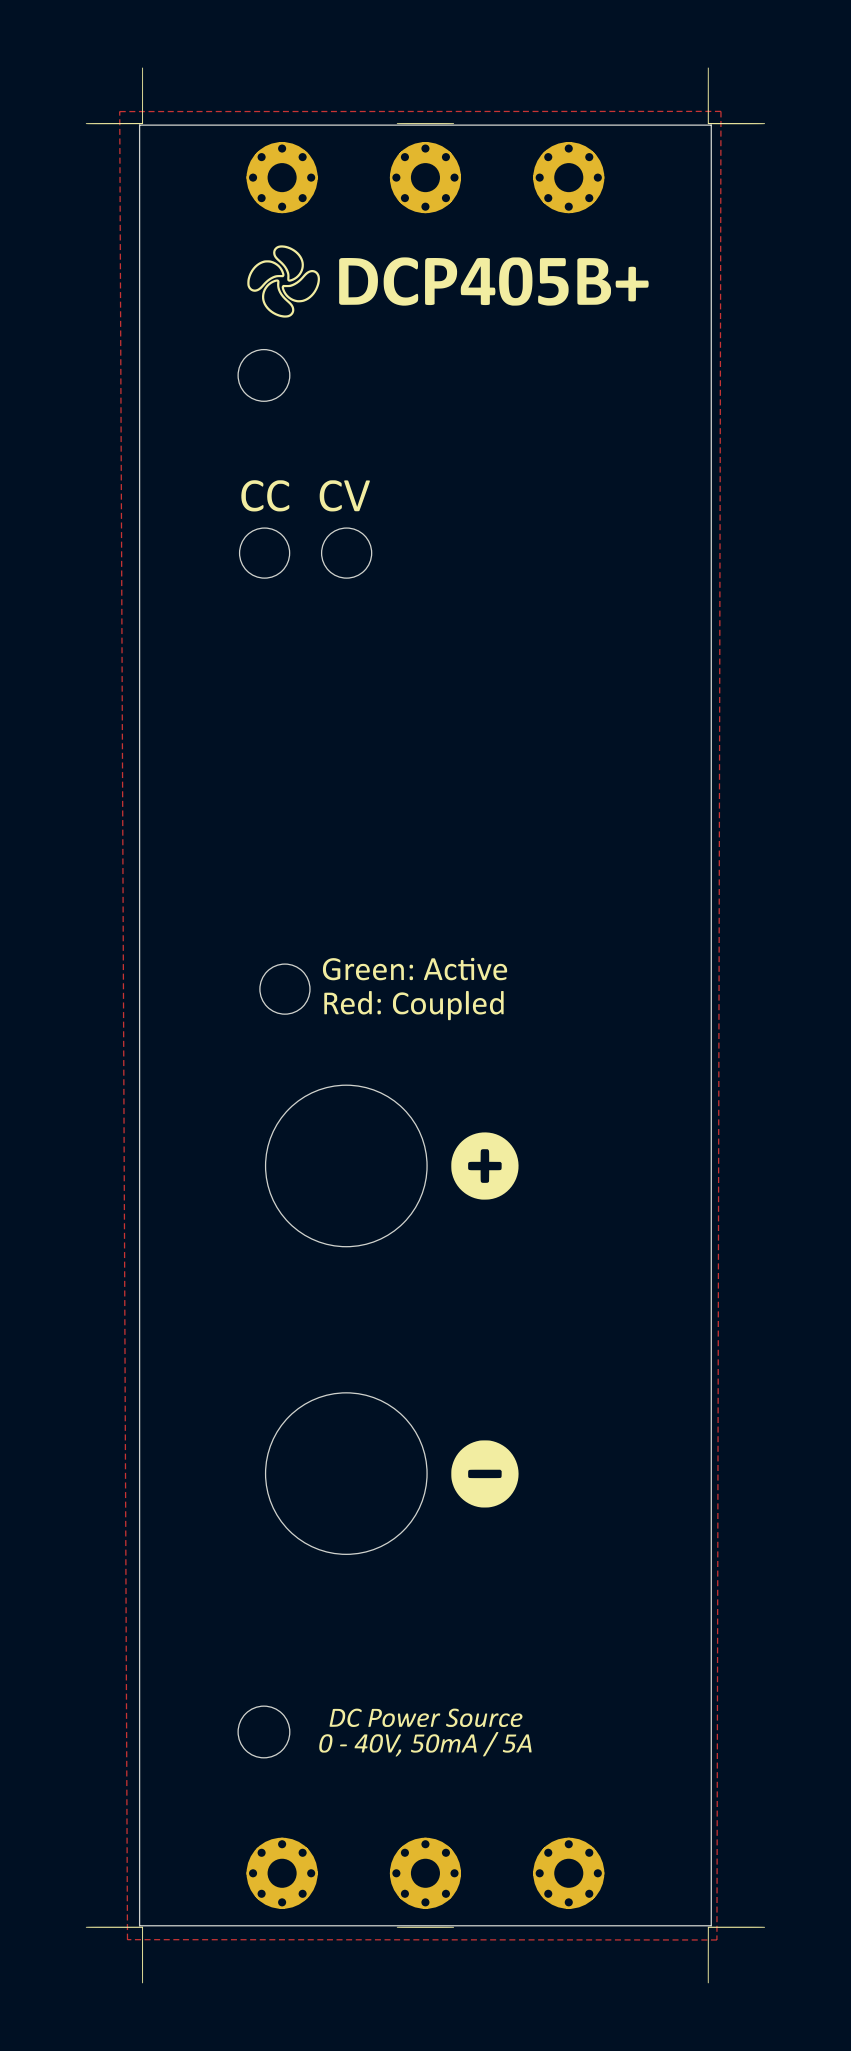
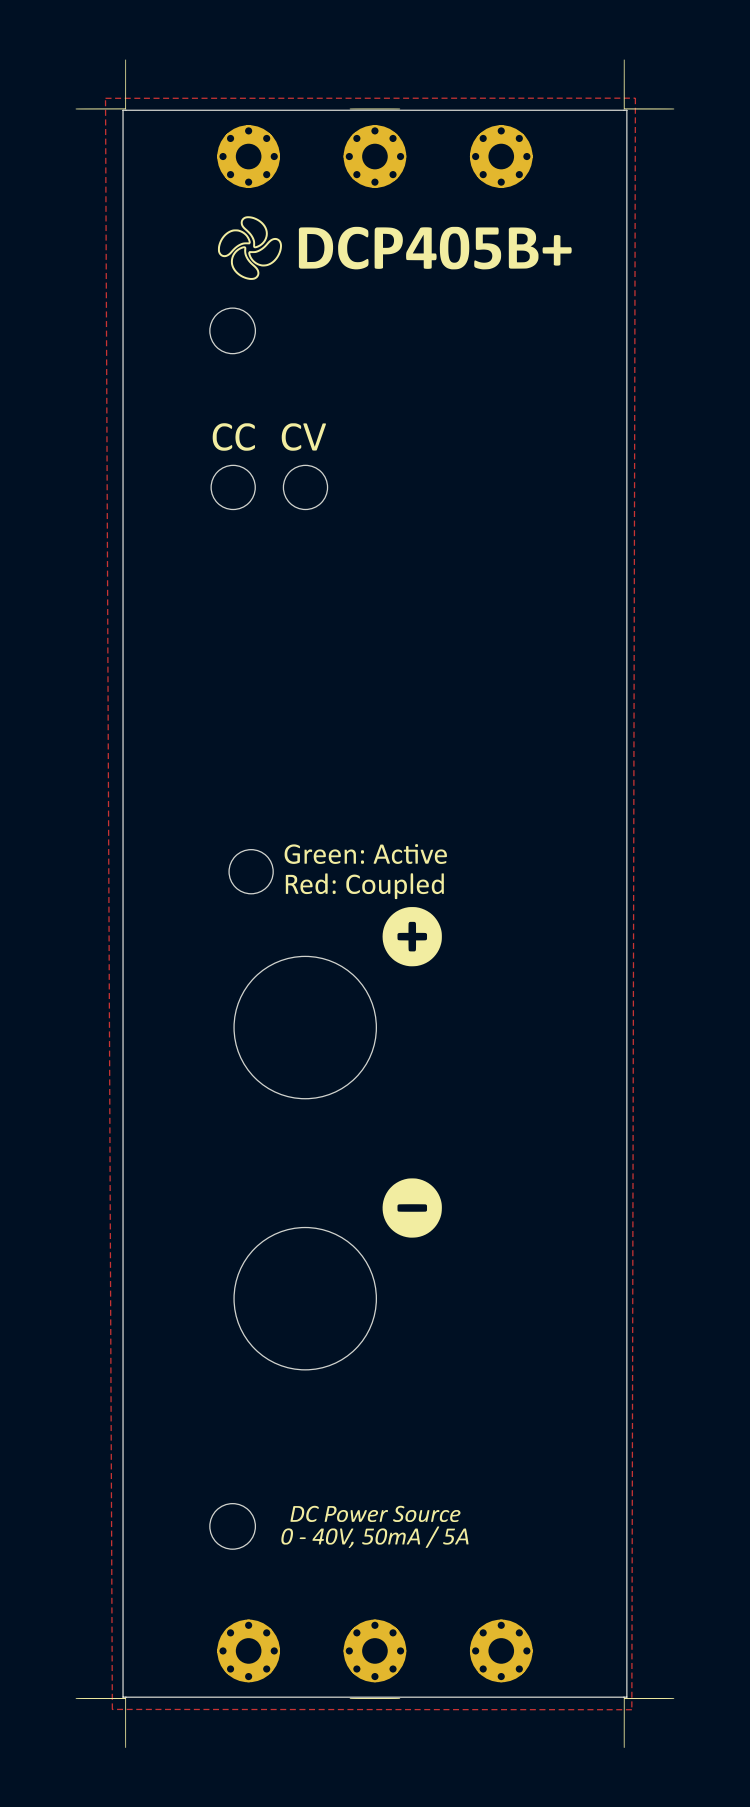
drawing shape: [85, 67, 766, 1984] -> [75, 59, 675, 1748]

